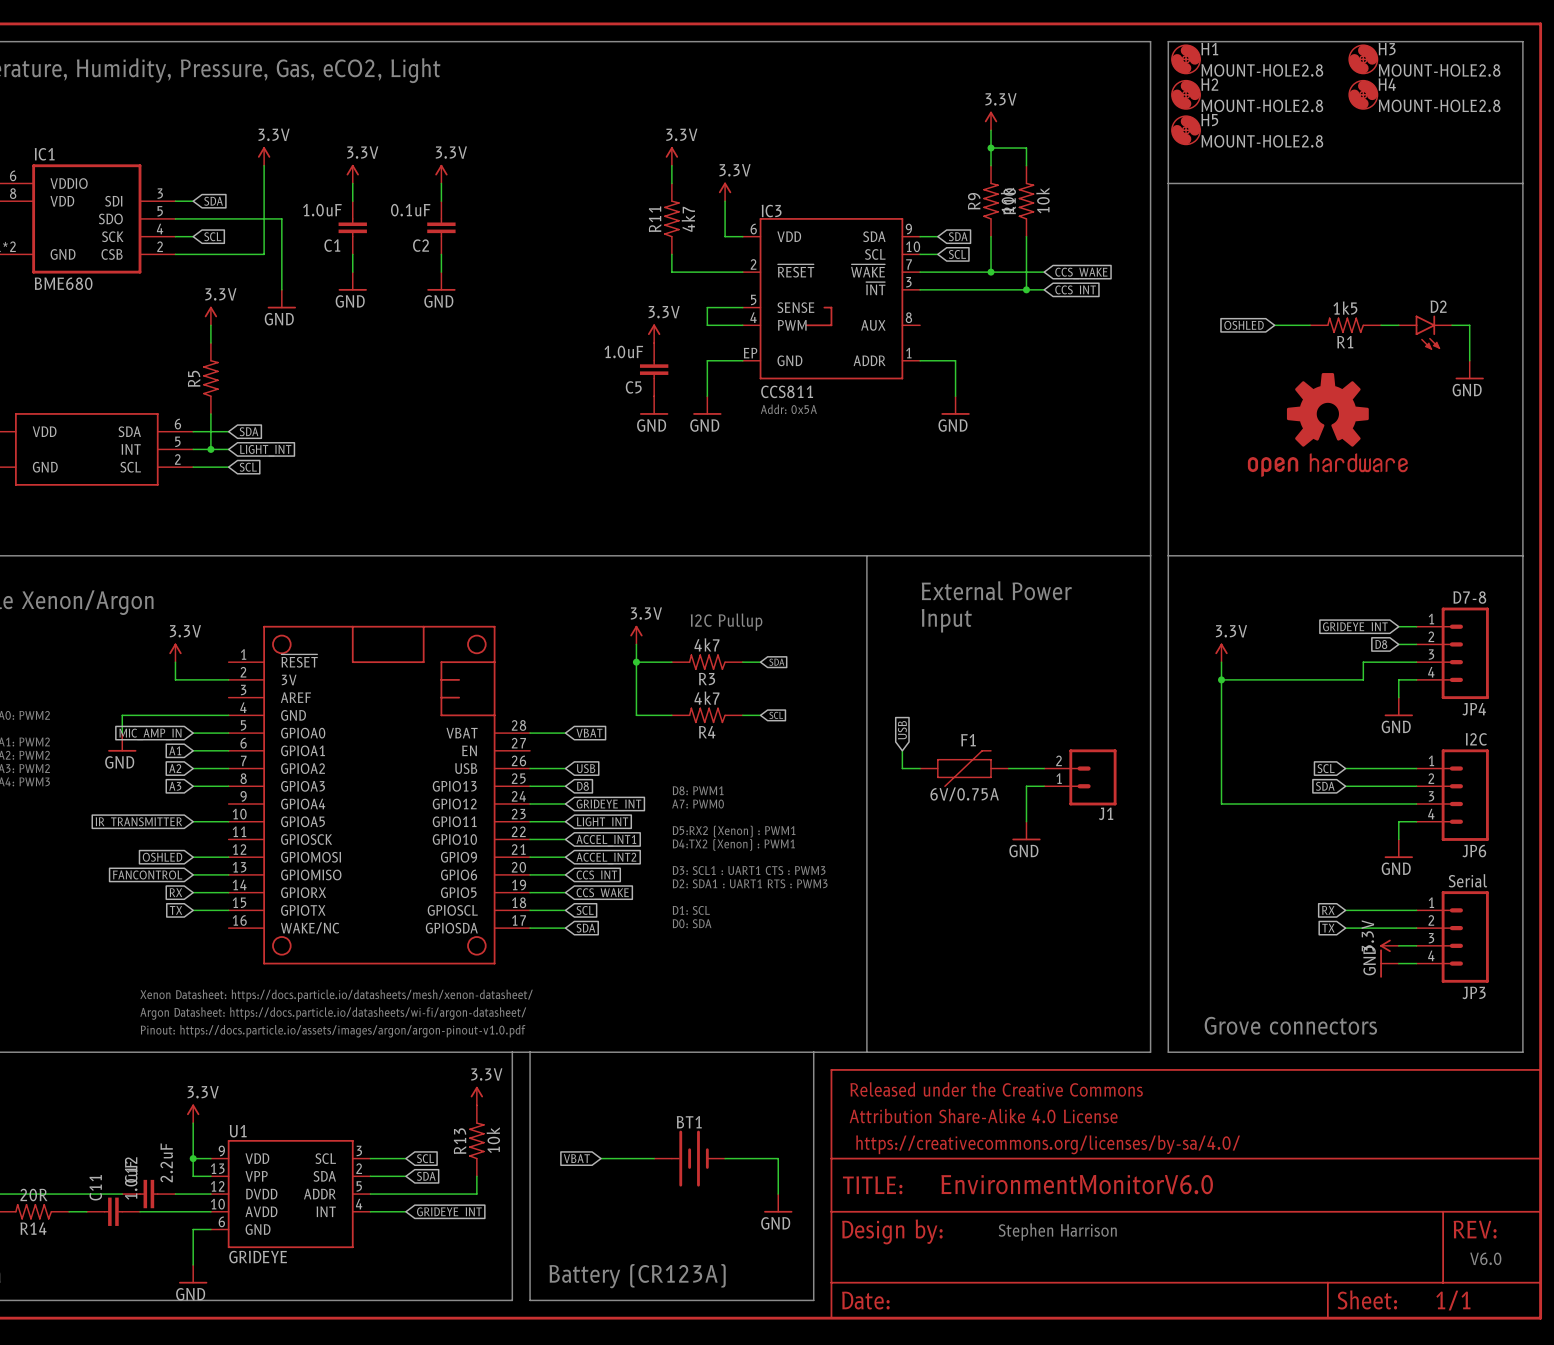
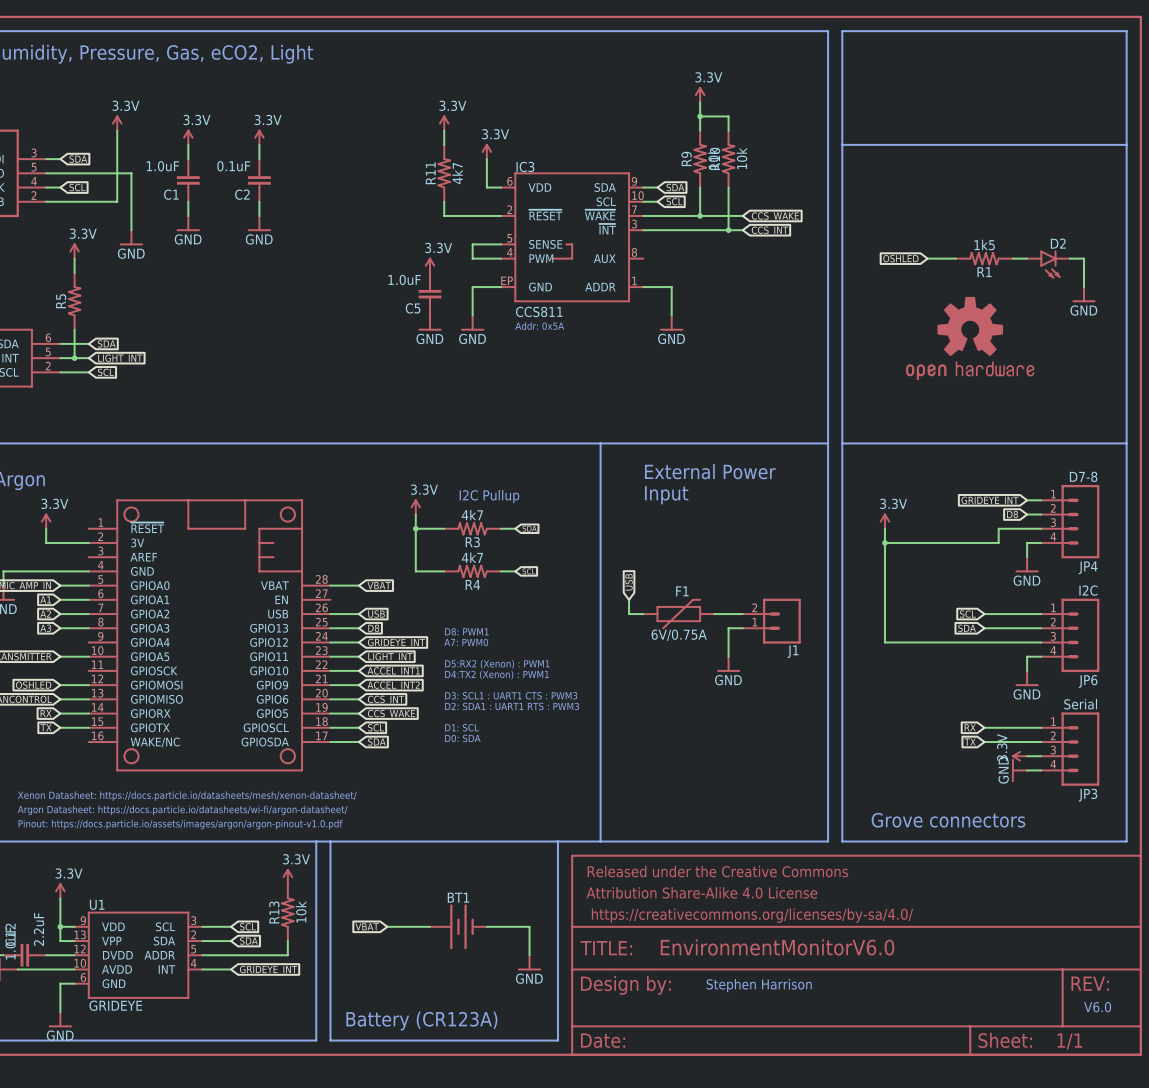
H1: MOUNT-HOLE2.8 (1186, 59) -> none
H3: MOUNT-HOLE2.8 (1363, 59) -> none
H2: MOUNT-HOLE2.8 (1186, 94) -> none
H4: MOUNT-HOLE2.8 (1363, 94) -> none
H5: MOUNT-HOLE2.8 (1186, 130) -> none

